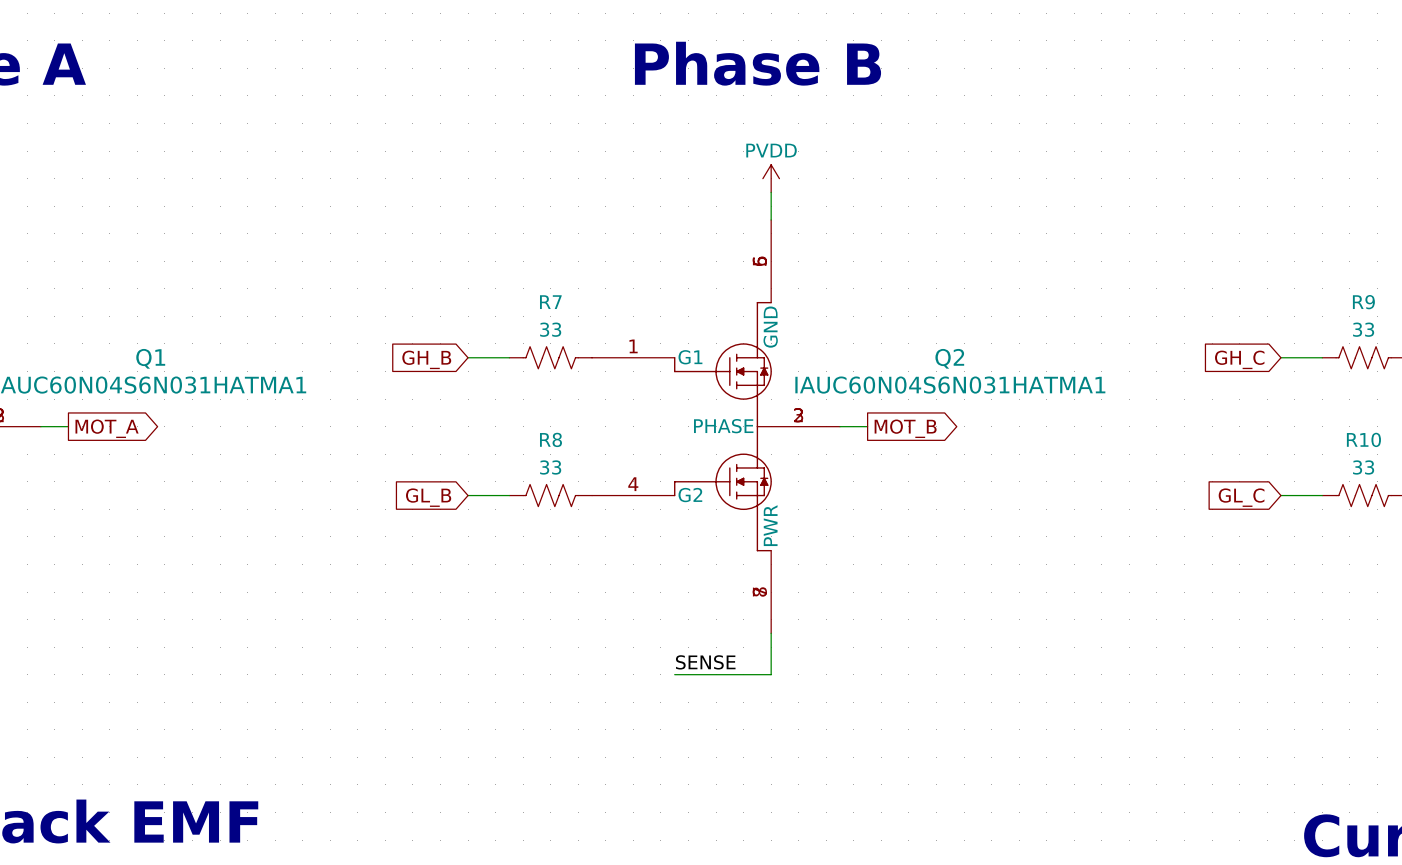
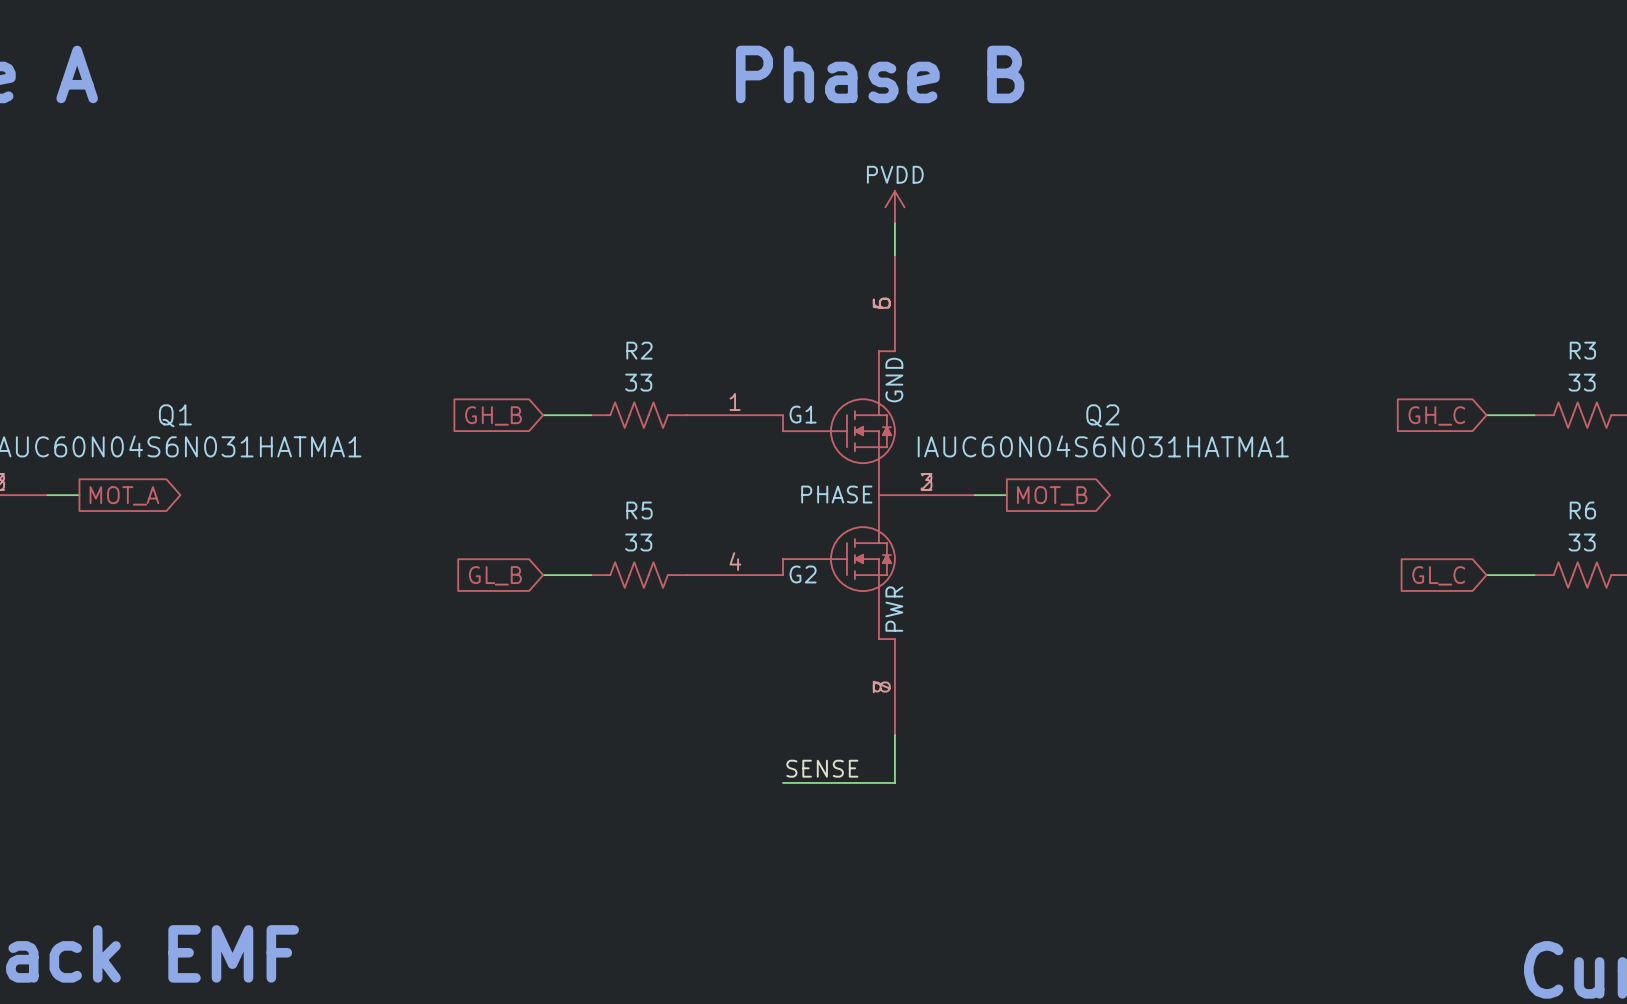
R7 name: R7 (550, 302) -> R2 (639, 350)
R9 name: R9 (1363, 302) -> R3 (1582, 350)
R8 name: R8 (550, 439) -> R5 (639, 510)
R10 name: R10 (1363, 439) -> R6 (1582, 510)

